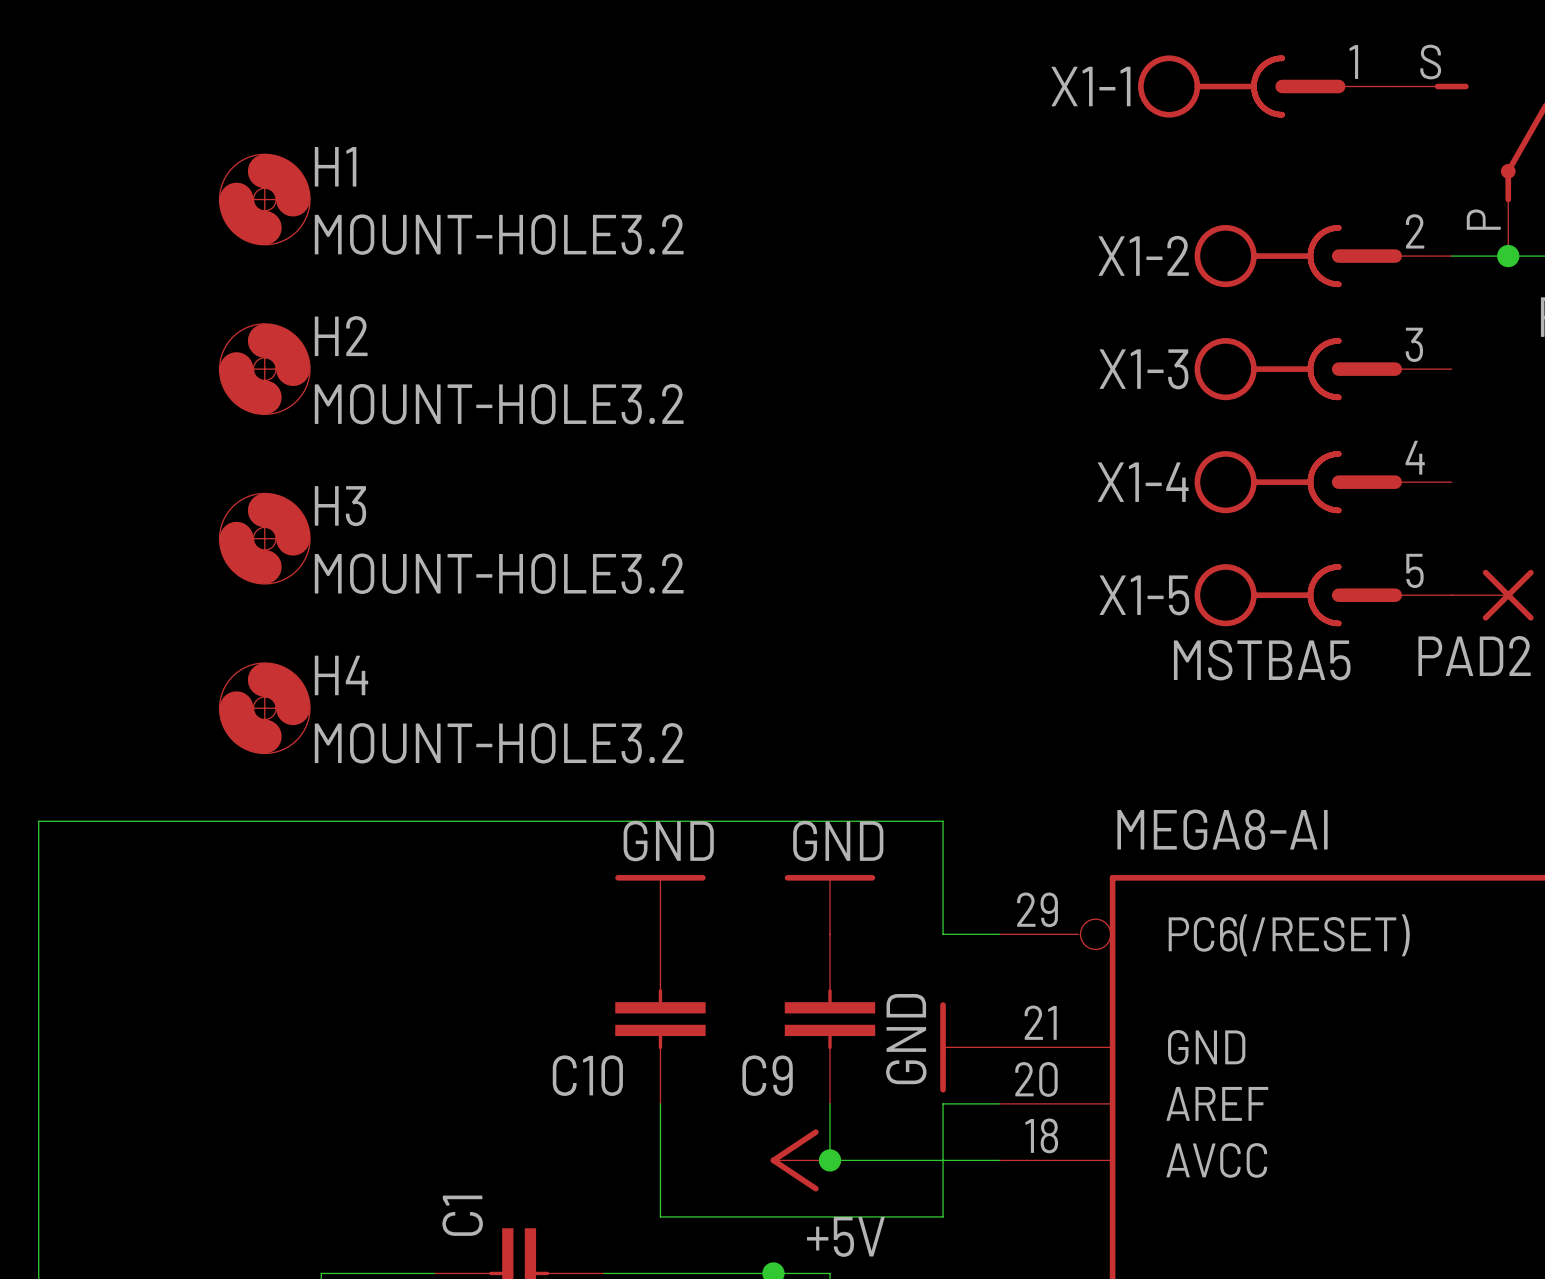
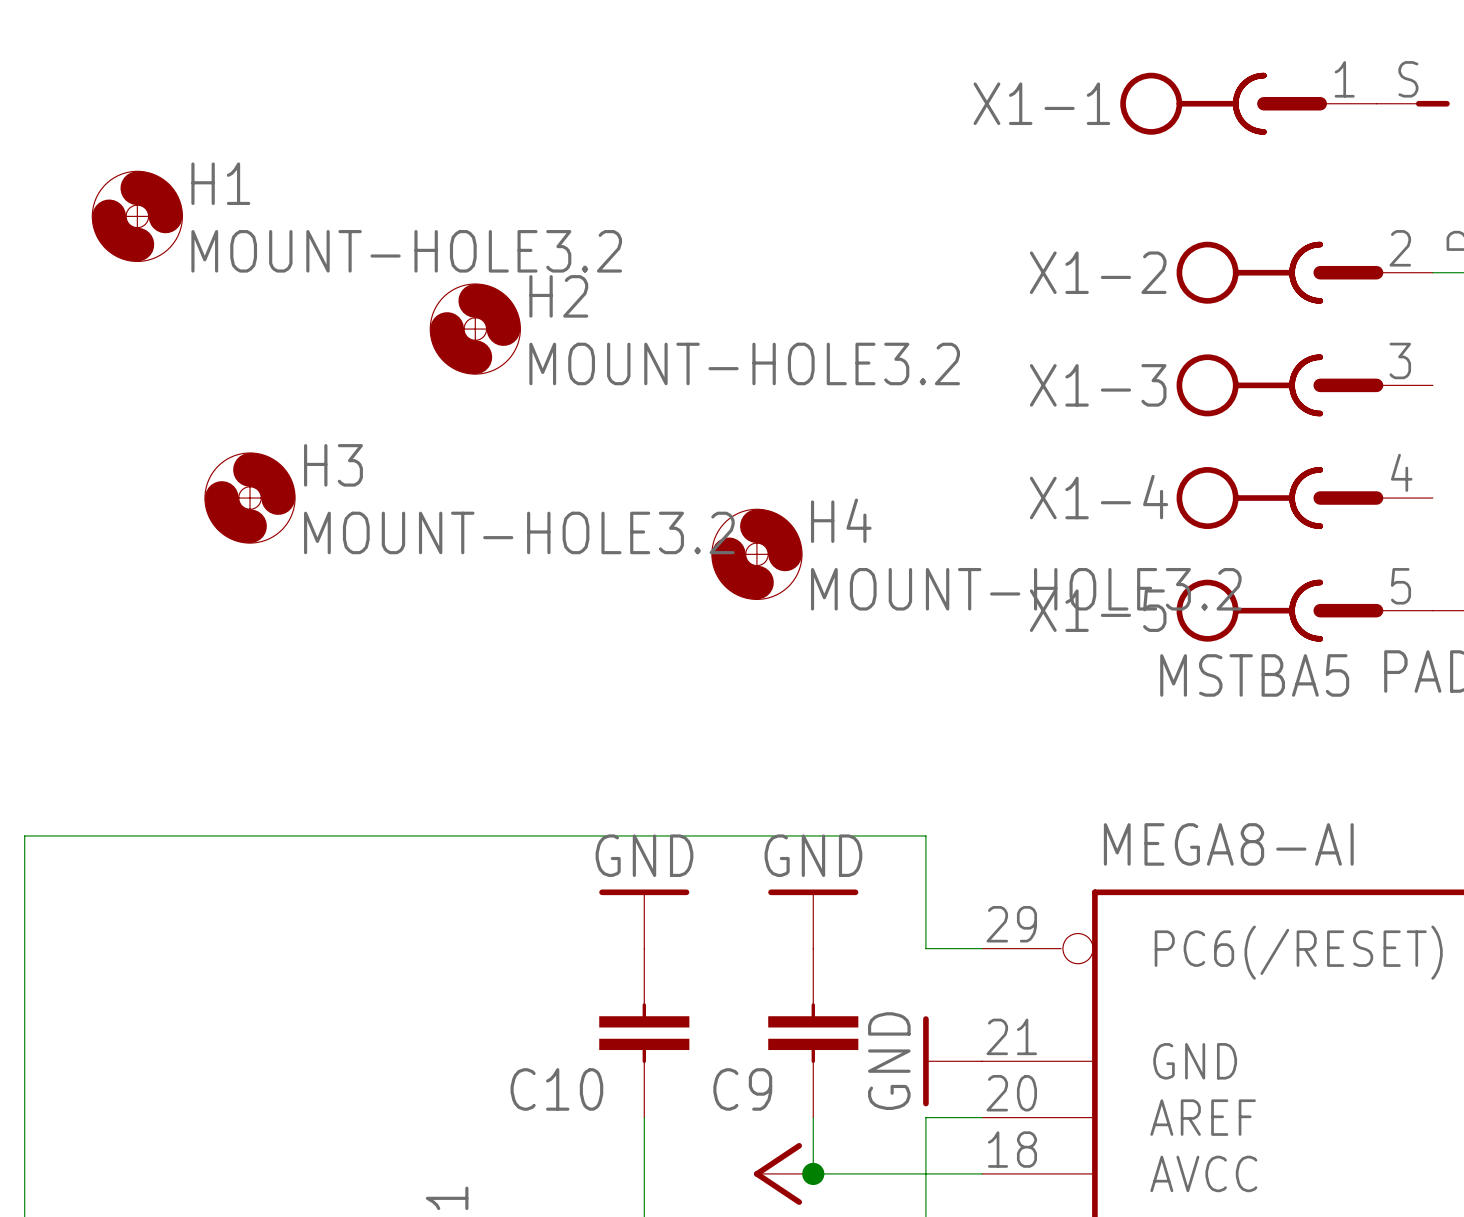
H1 position: (264, 199) -> (137, 216)
H2 position: (264, 369) -> (475, 329)
H3 position: (264, 538) -> (250, 498)
H4 position: (264, 708) -> (756, 554)

